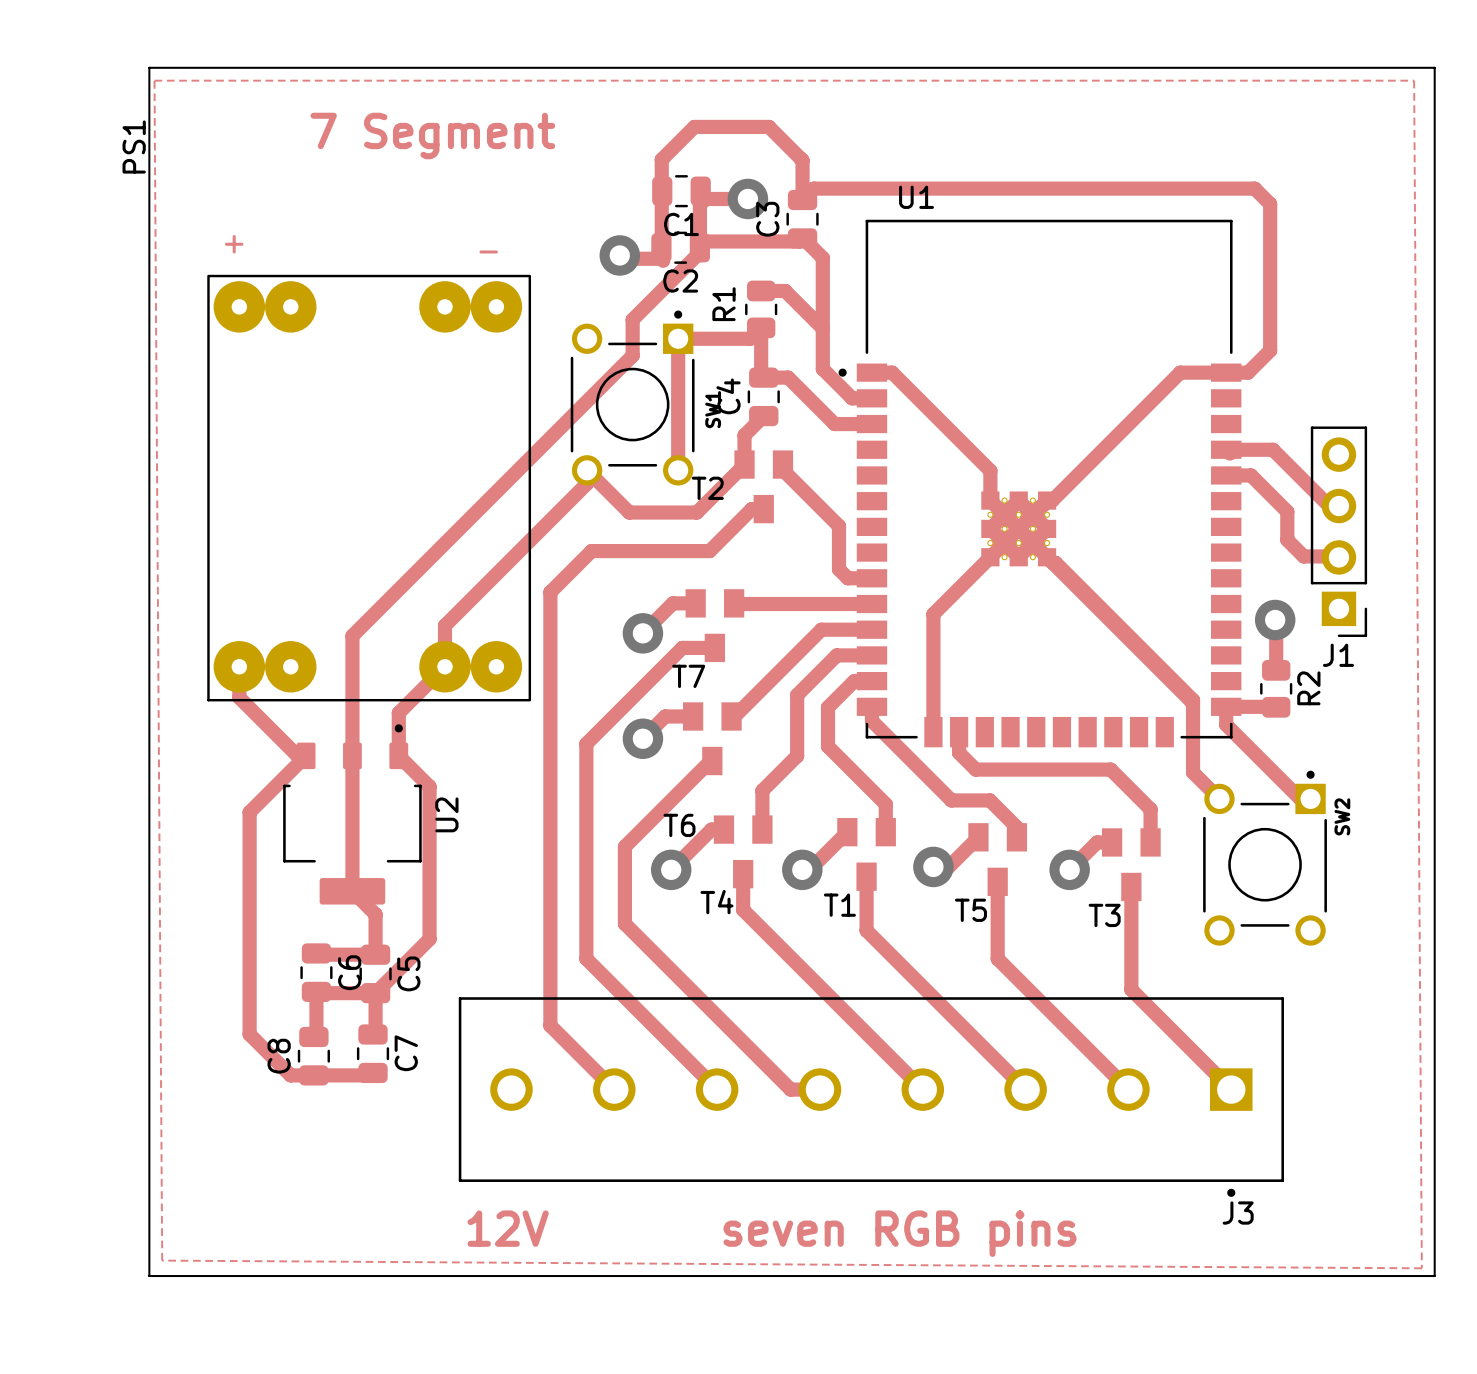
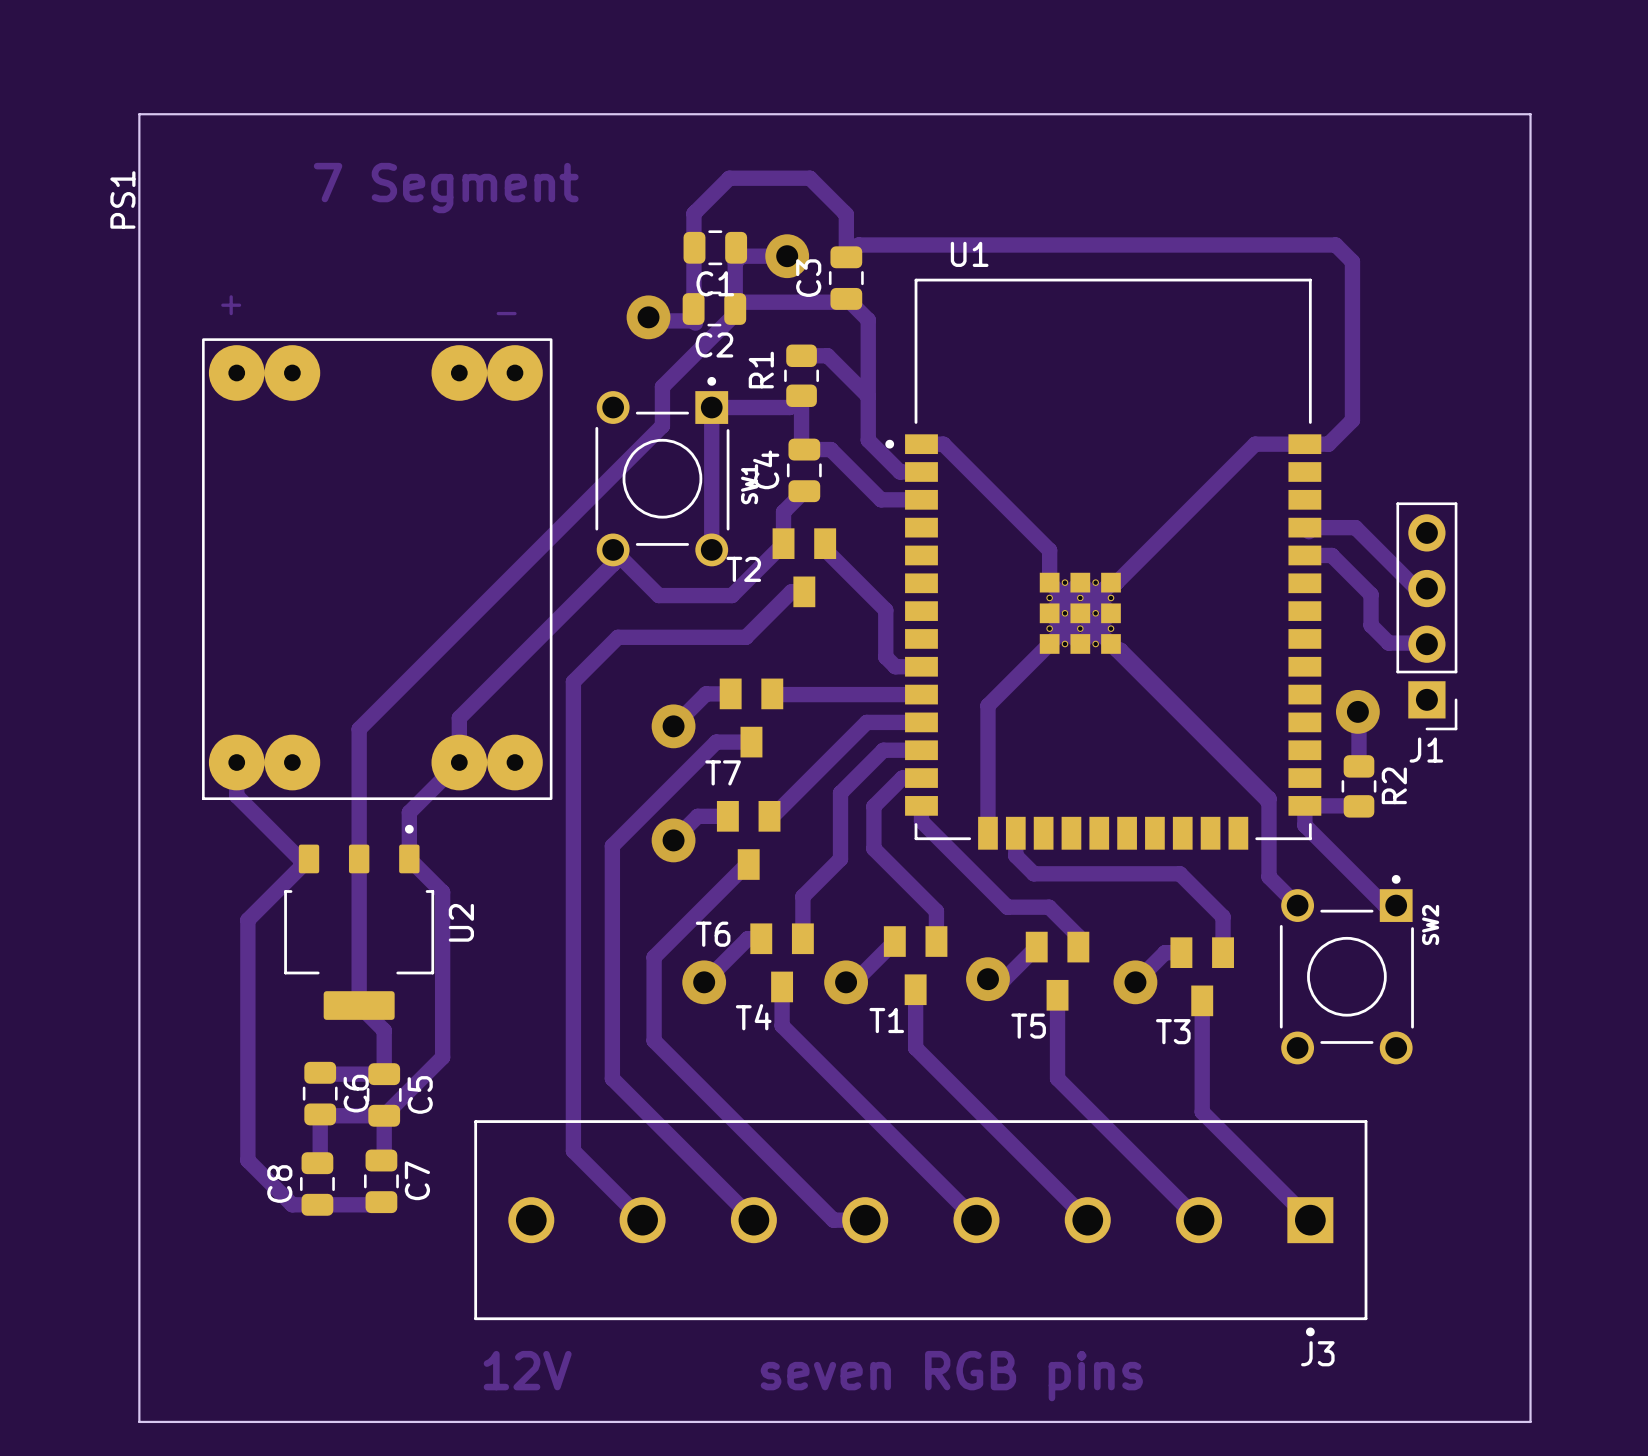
zone outline: (154, 80) (162, 1260) (1421, 1268) (1414, 80) (154, 80) -> none

